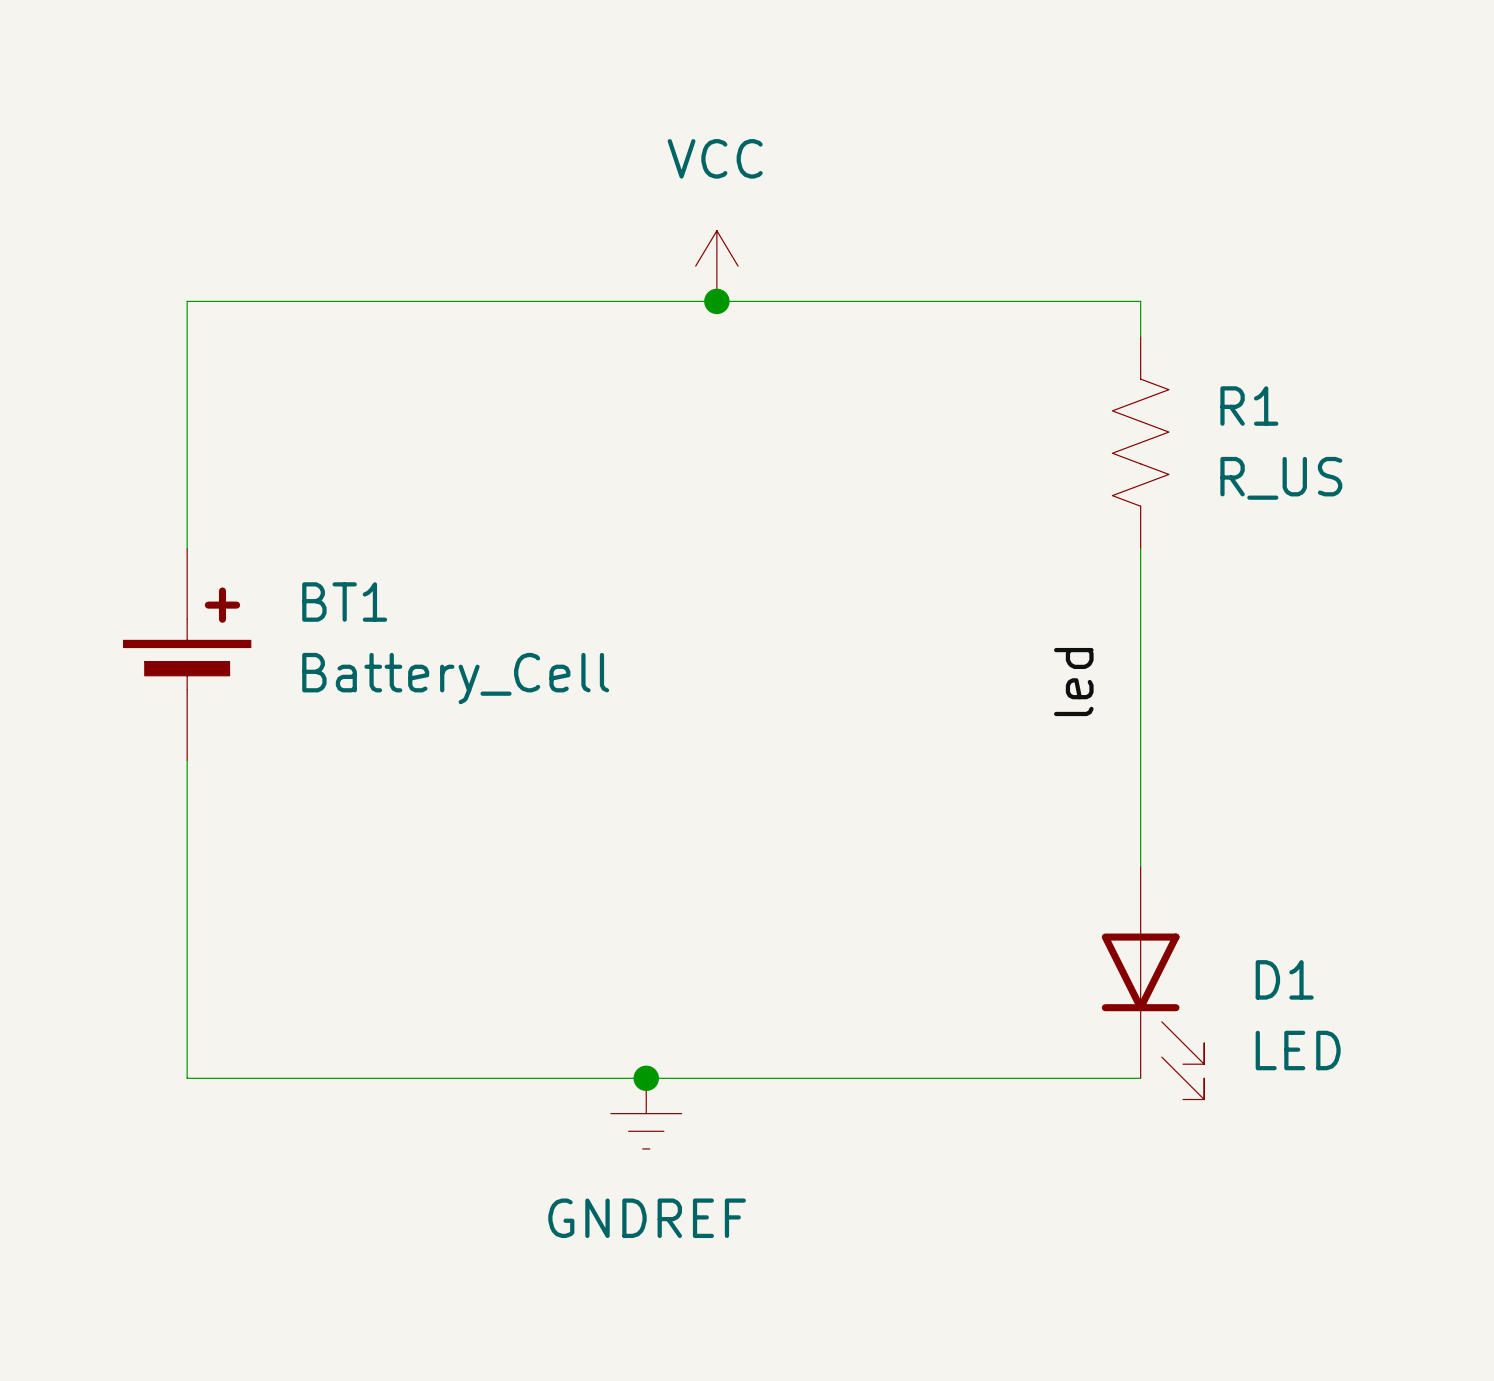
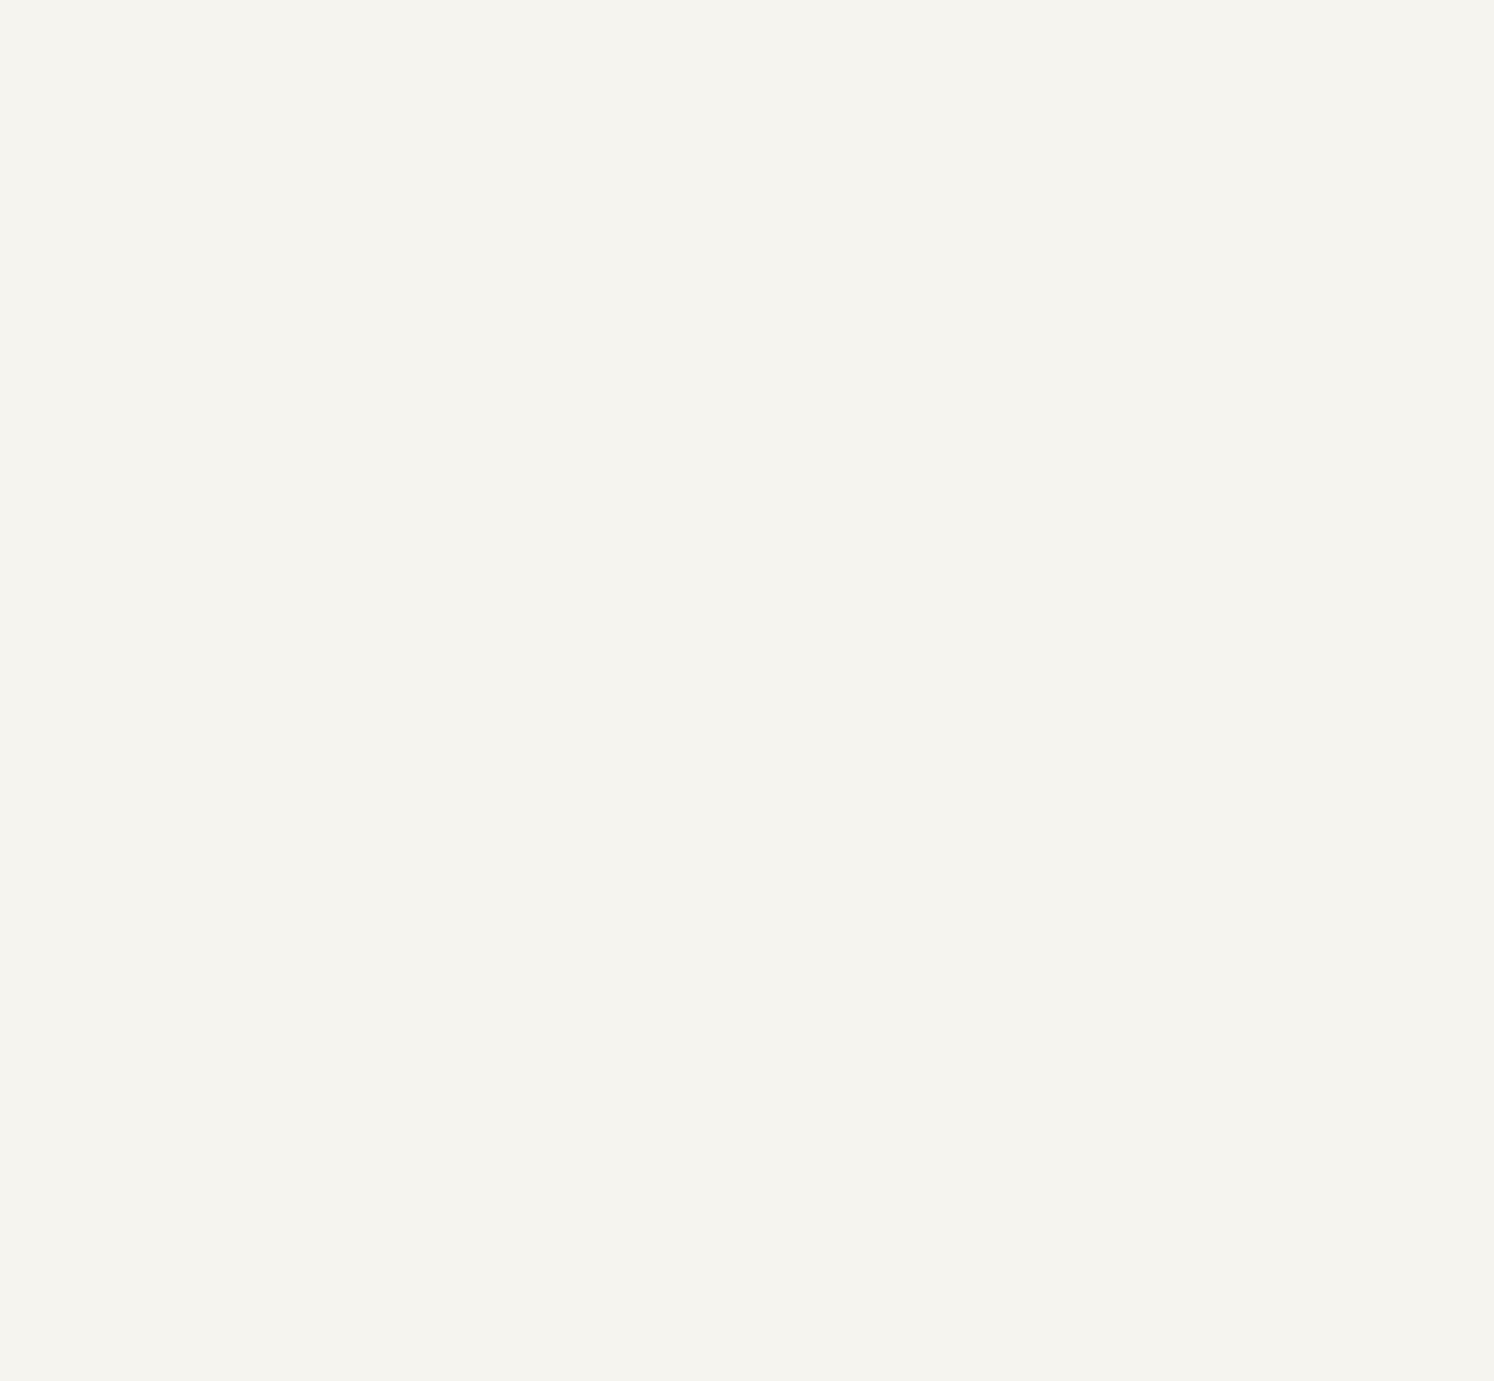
power symbol: VCC (716, 266) -> none
junction: (716, 301) -> none
wire: (1140, 336) (1140, 301) (187, 301) (187, 548) -> none
R1: R_US (1140, 442) -> none
wire: (1140, 548) (1140, 866) -> none
BT1: Battery_Cell (187, 654) -> none
label: led (1073, 682) -> none
wire: (187, 760) (187, 1078) (1140, 1078) -> none
D1: LED (1153, 982) -> none
junction: (646, 1078) -> none
power symbol: GNDREF (646, 1113) -> none

